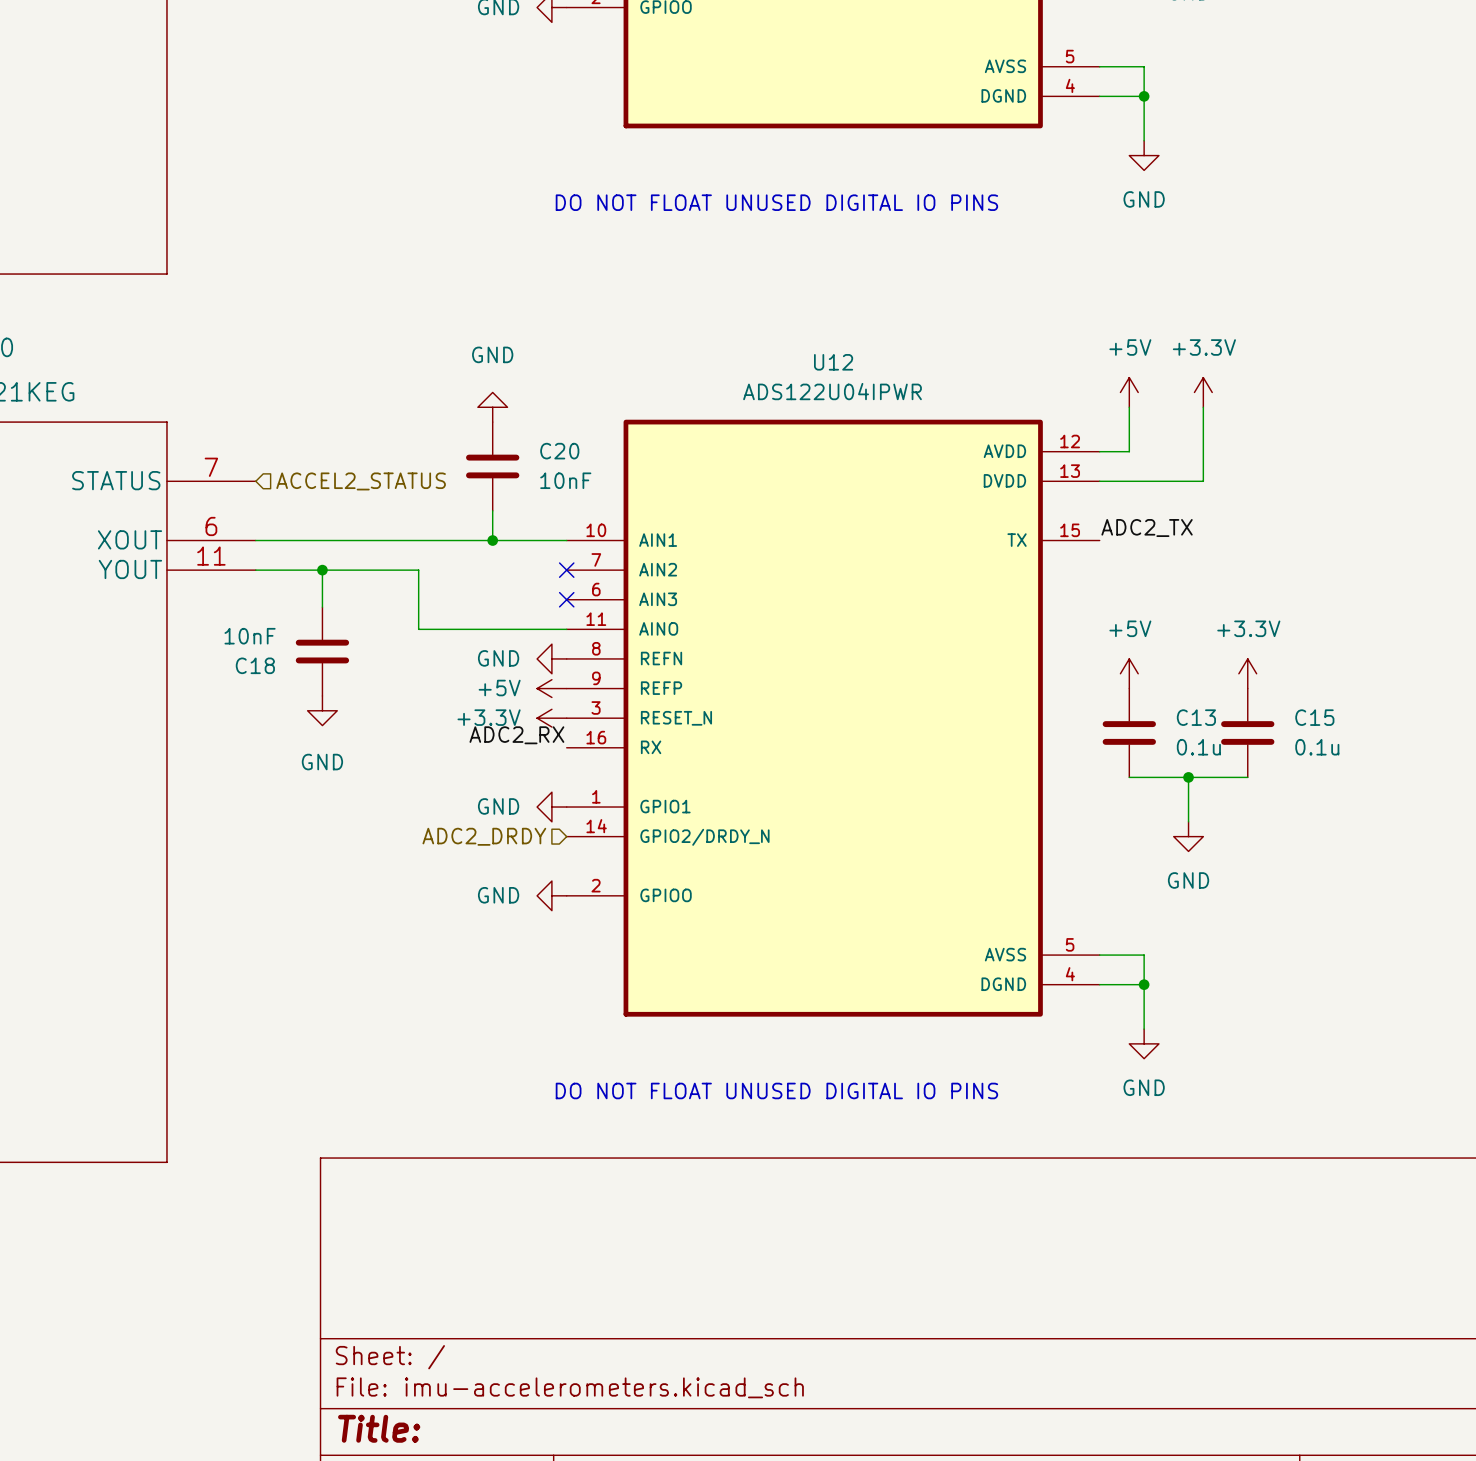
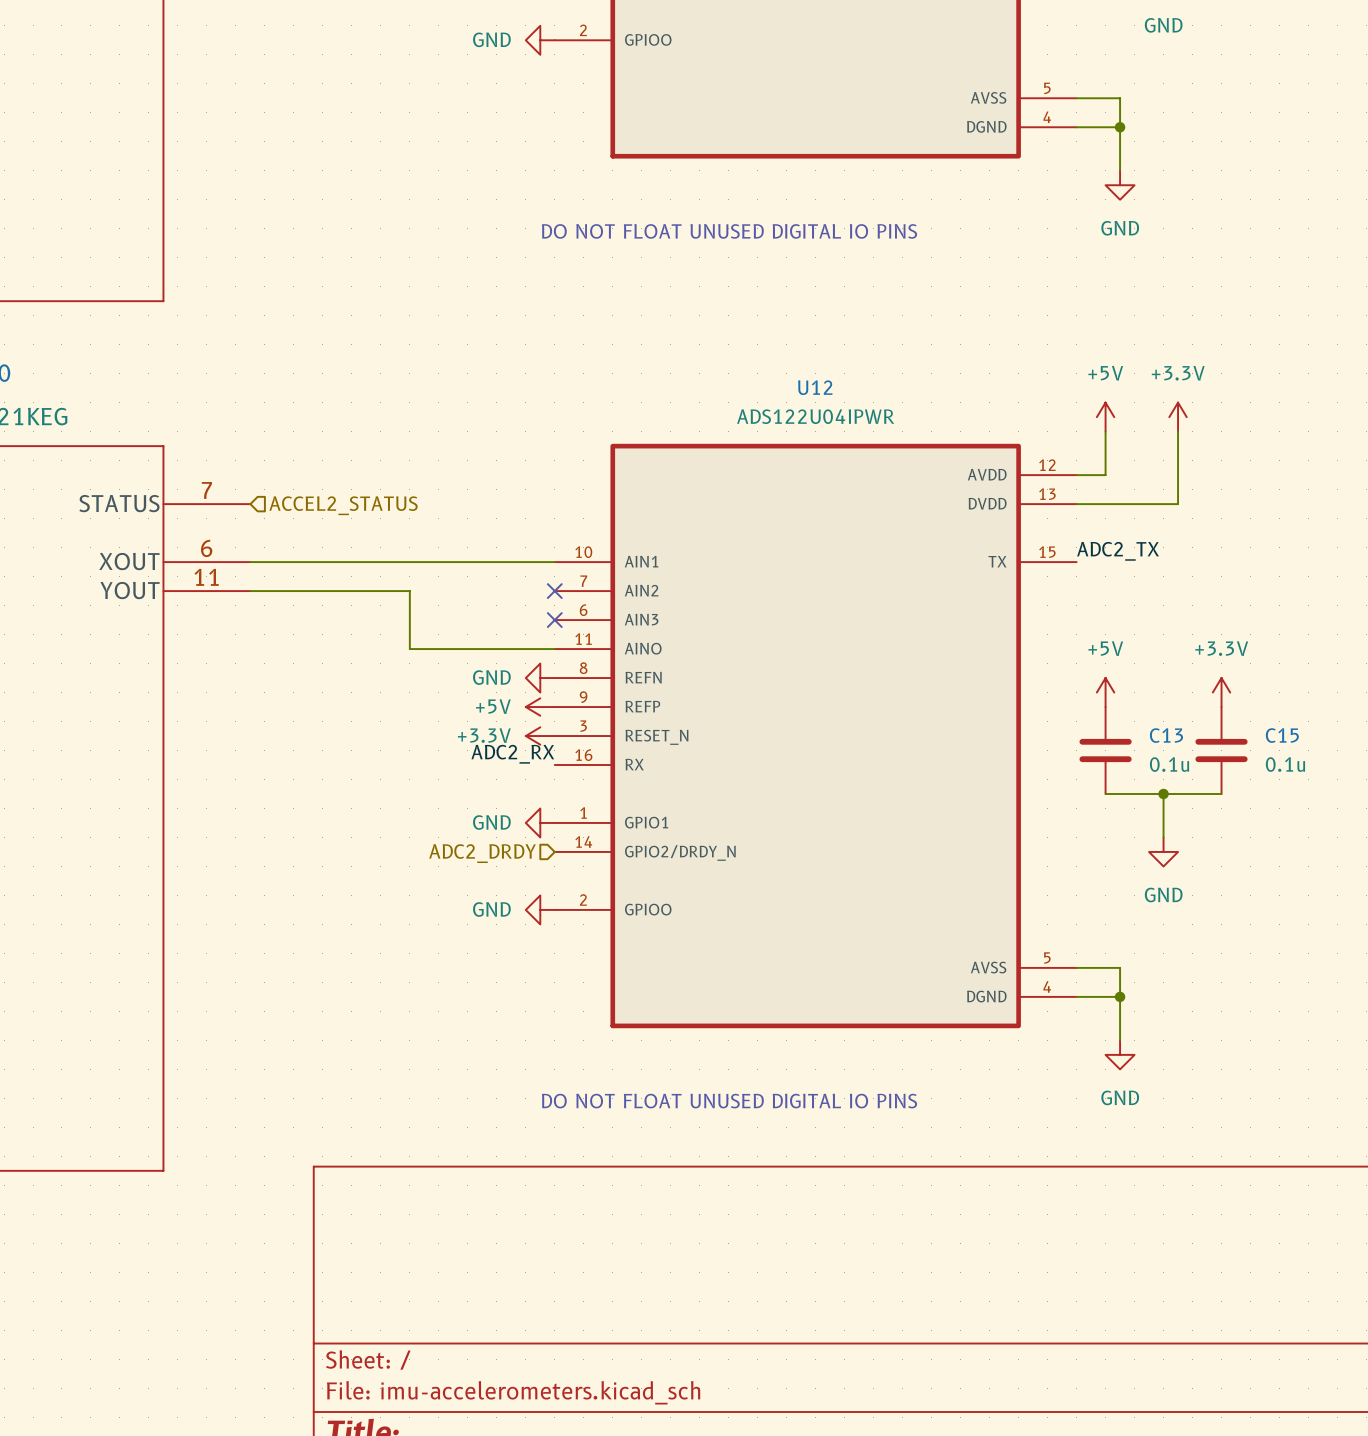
power symbol: GND (492, 407) -> none
C20: 10nF (492, 466) -> none
wire: (492, 510) (492, 540) -> none
junction: (492, 540) -> none
wire: (322, 570) (322, 607) -> none
junction: (322, 570) -> none
C18: 10nF (322, 651) -> none
power symbol: GND (322, 710) -> none

